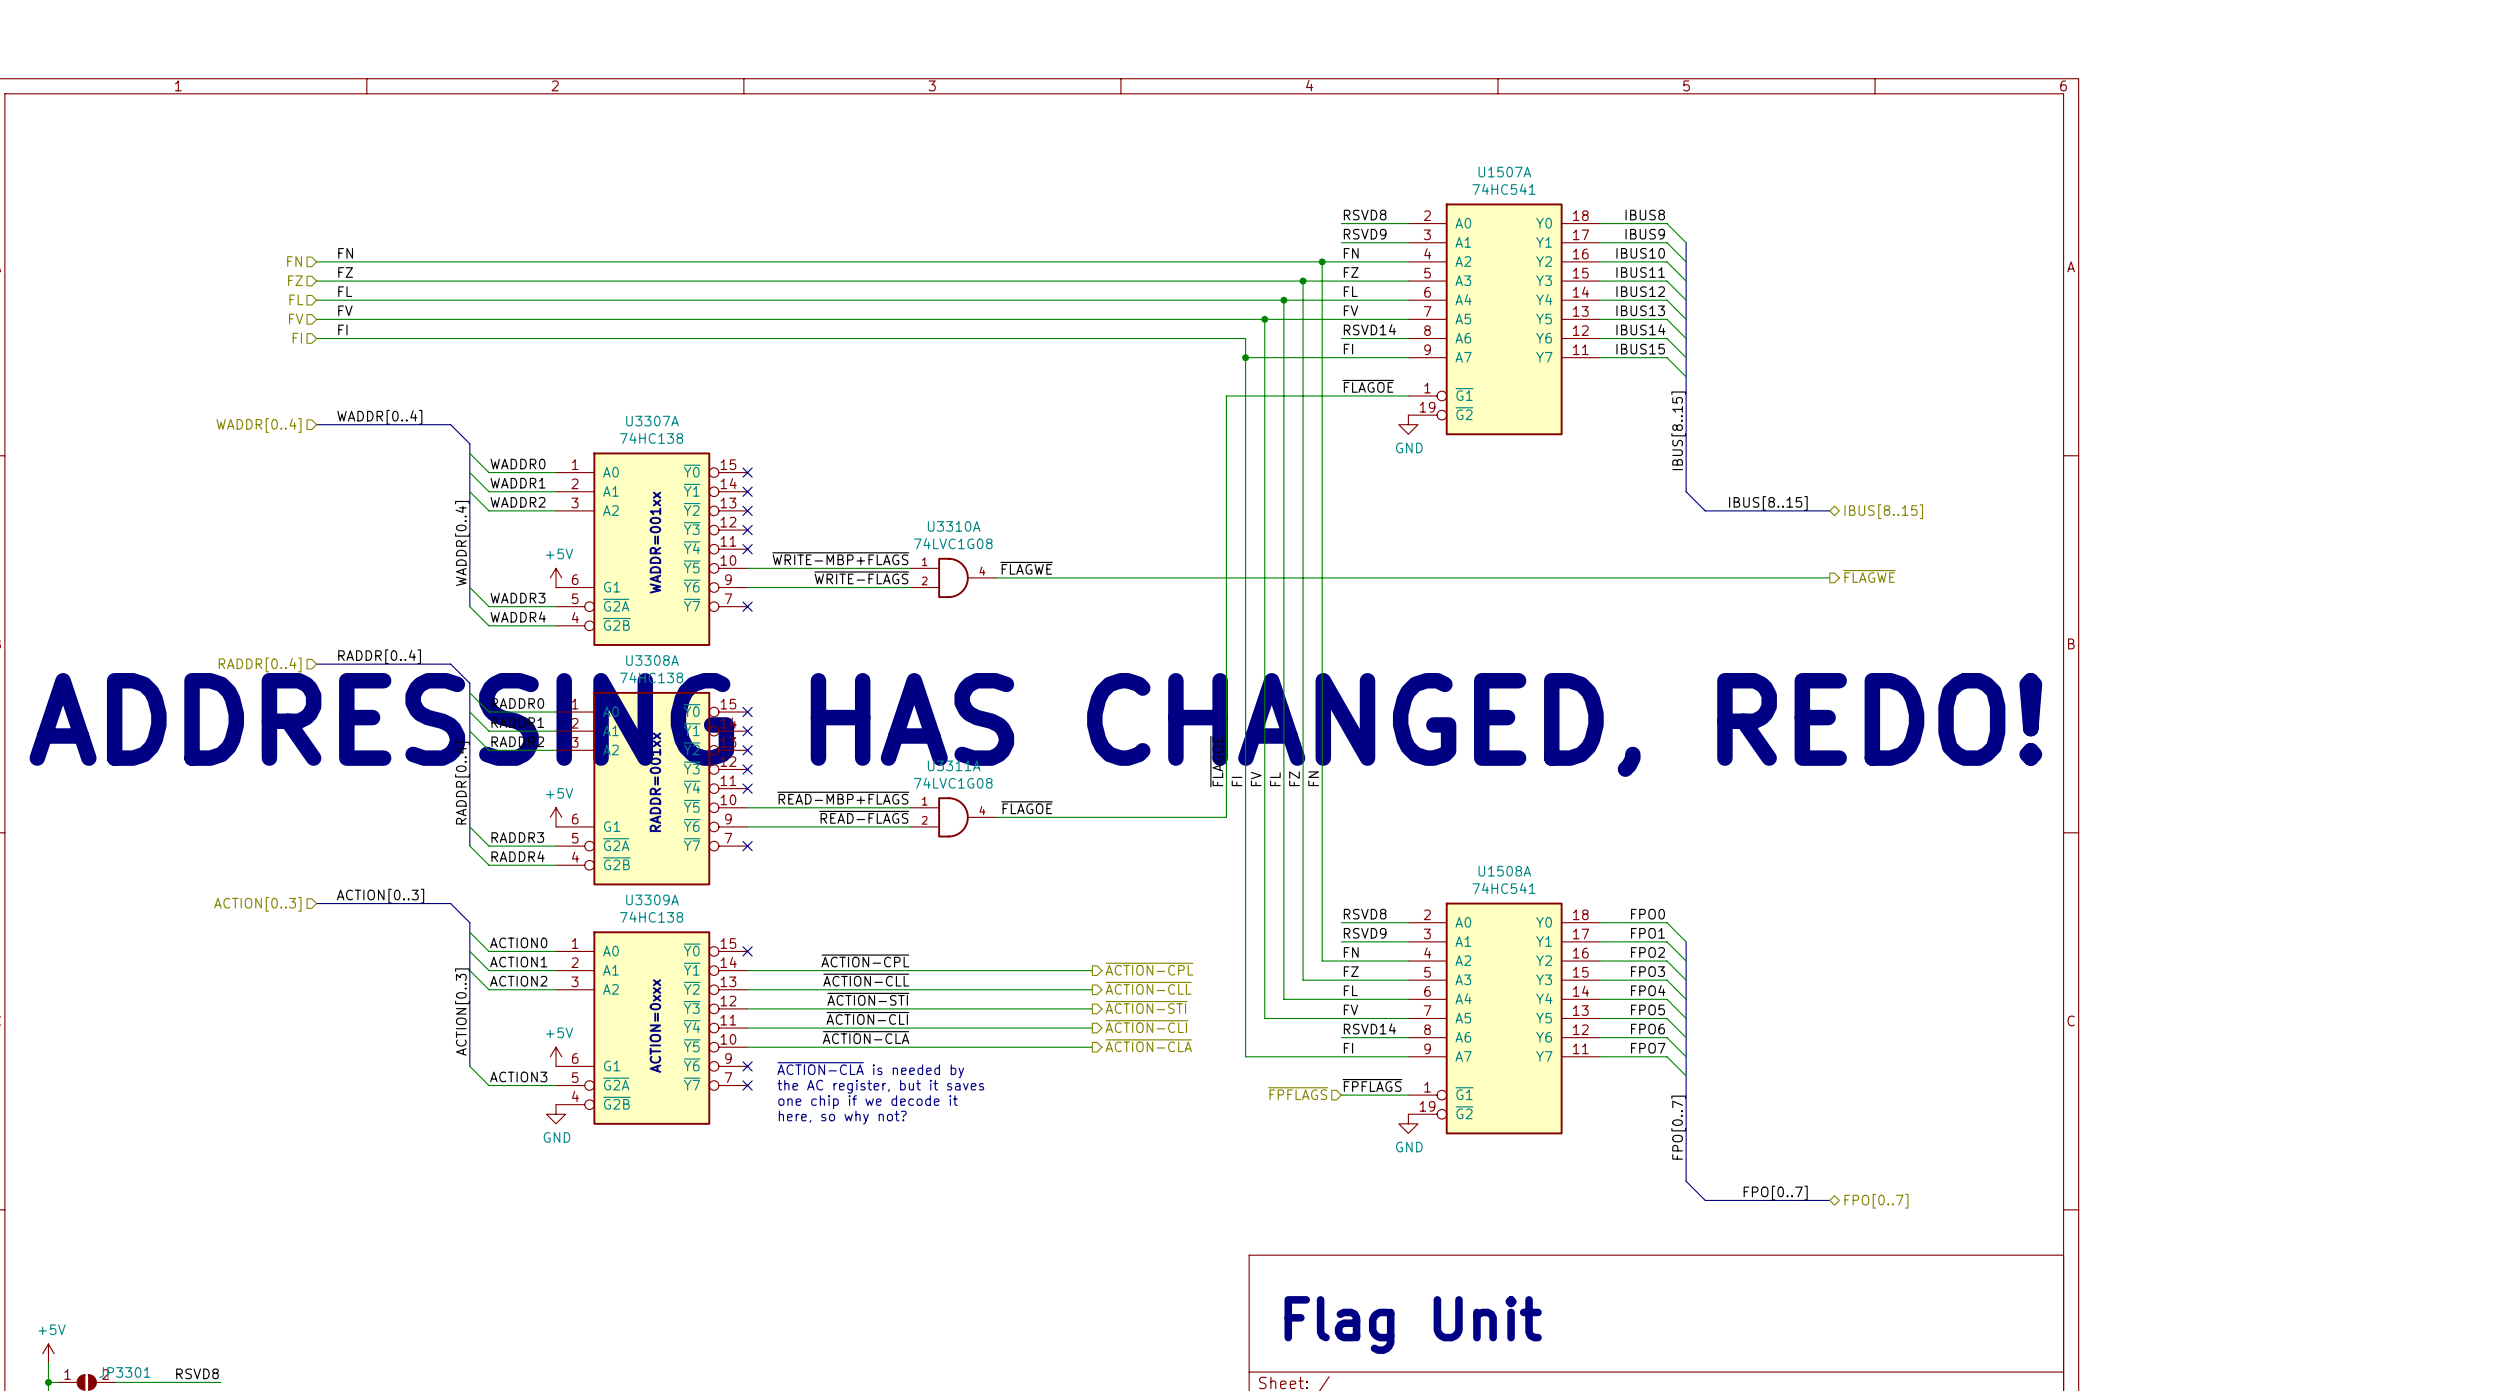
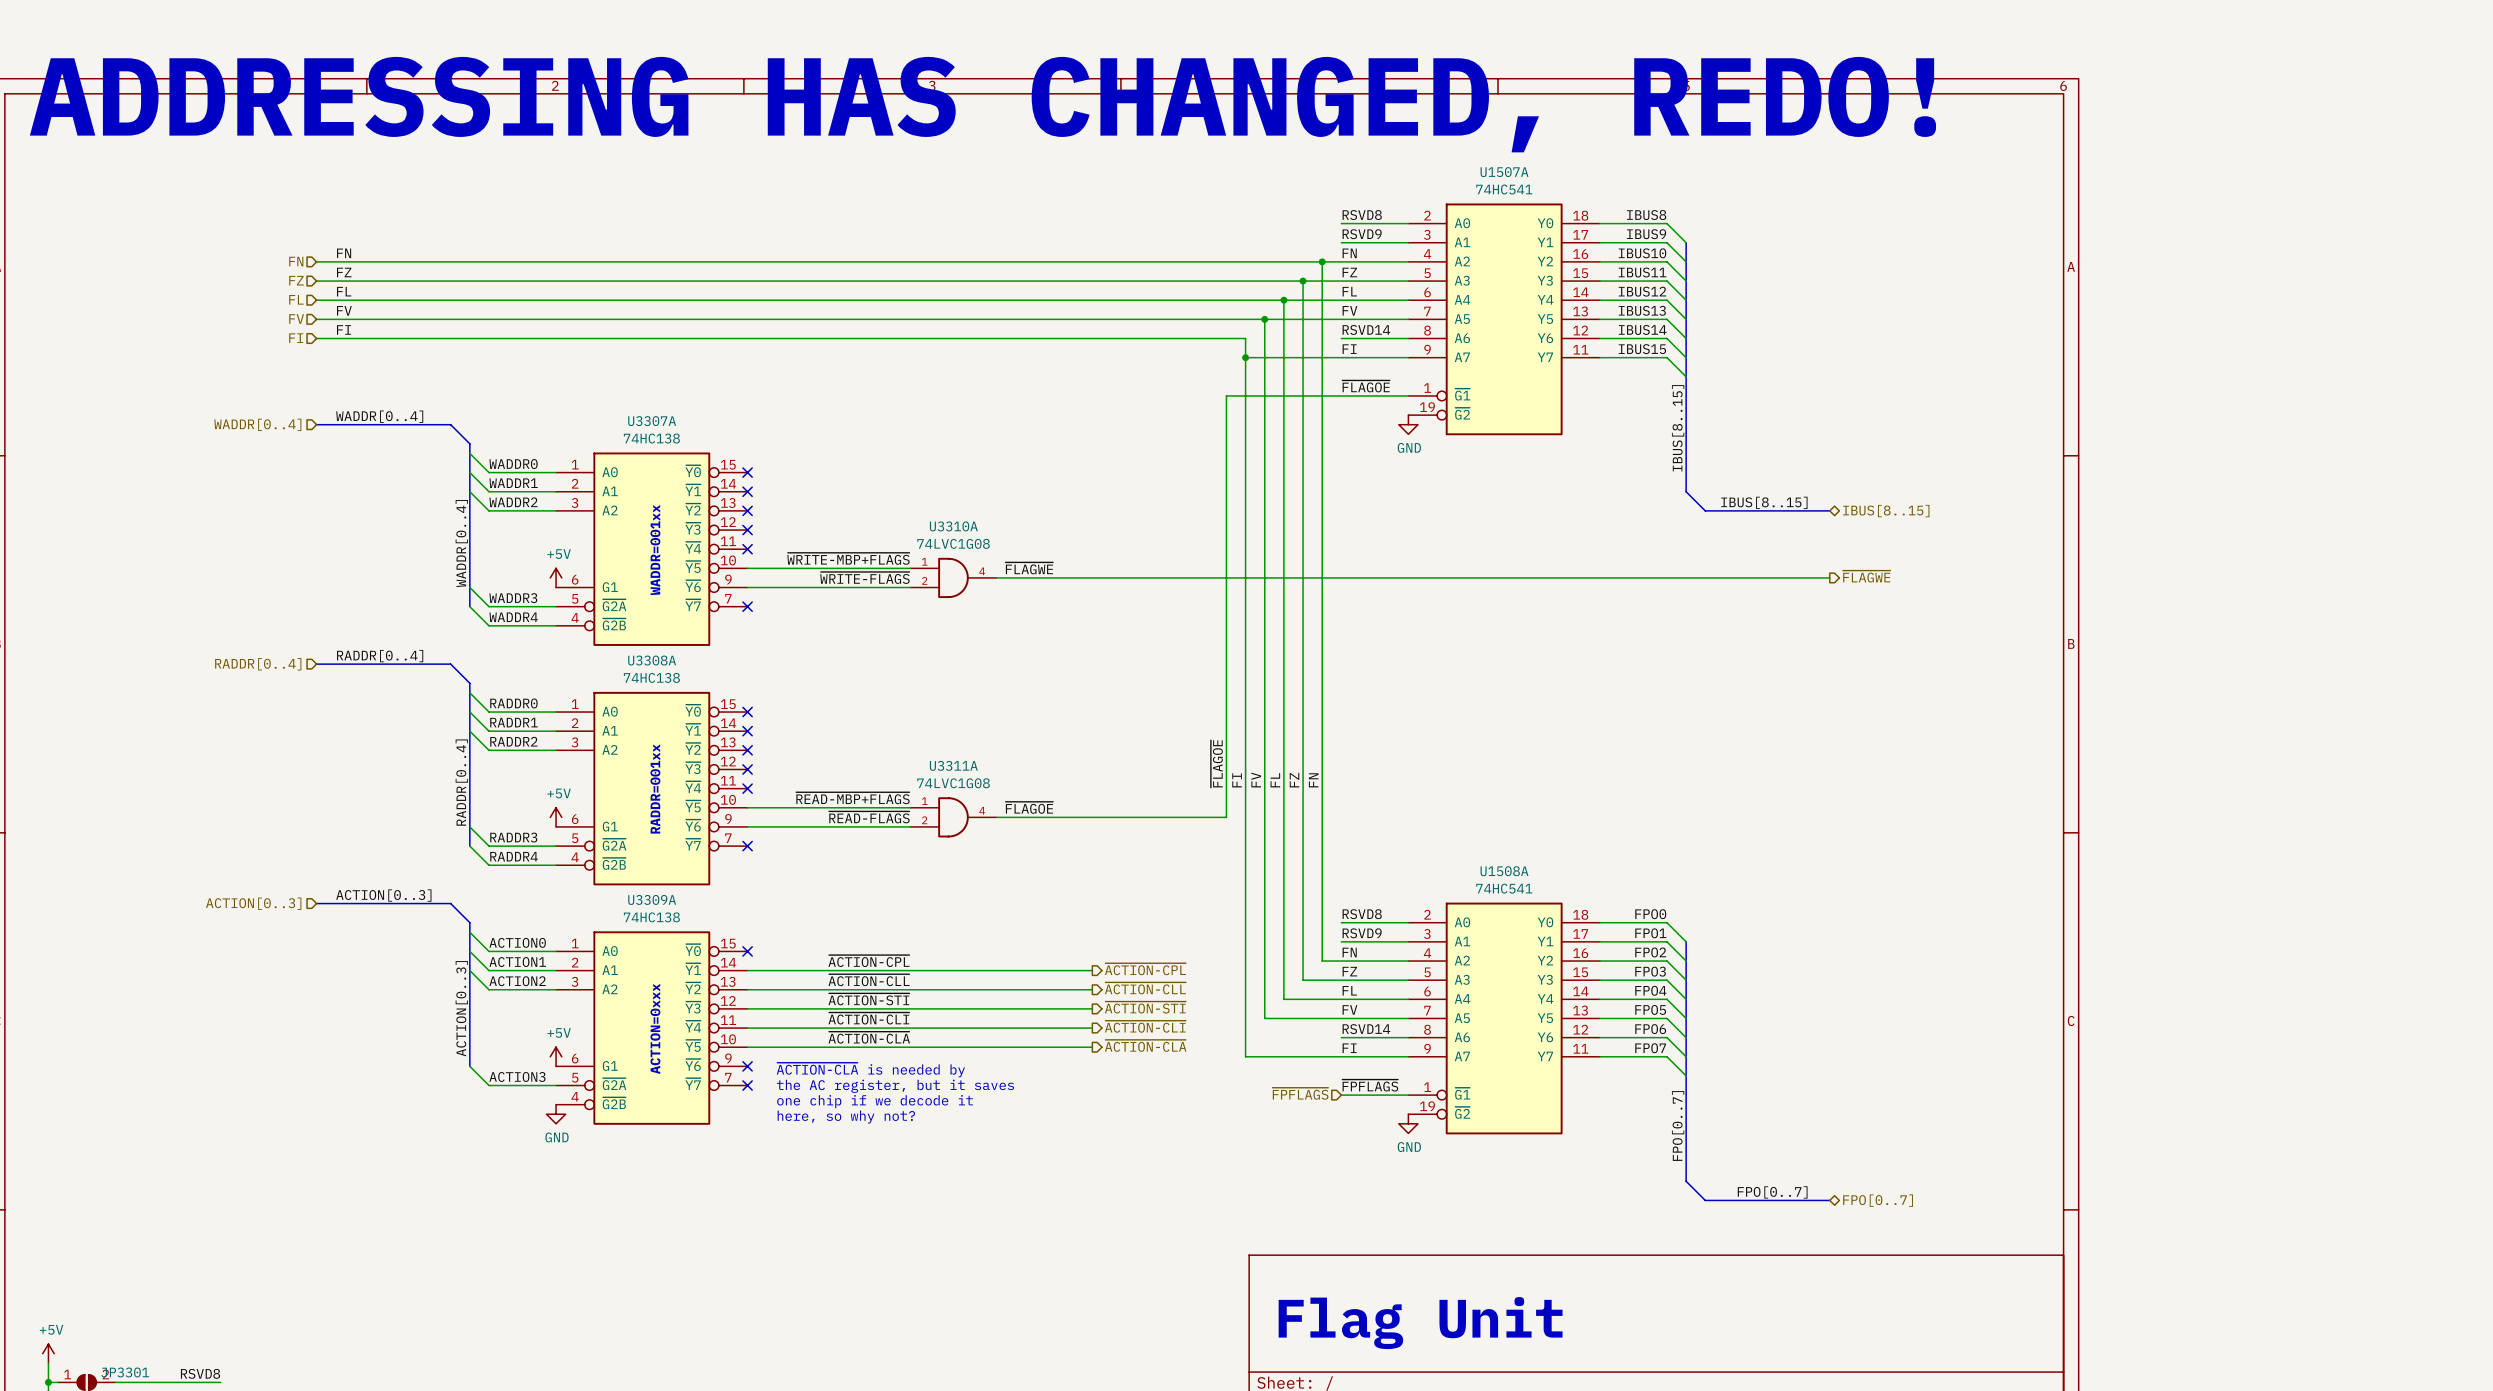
text: none -> ADDRESSING HAS CHANGED, REDO! (982, 104)
text: ADDRESSING HAS CHANGED, REDO! (1035, 724) -> none

